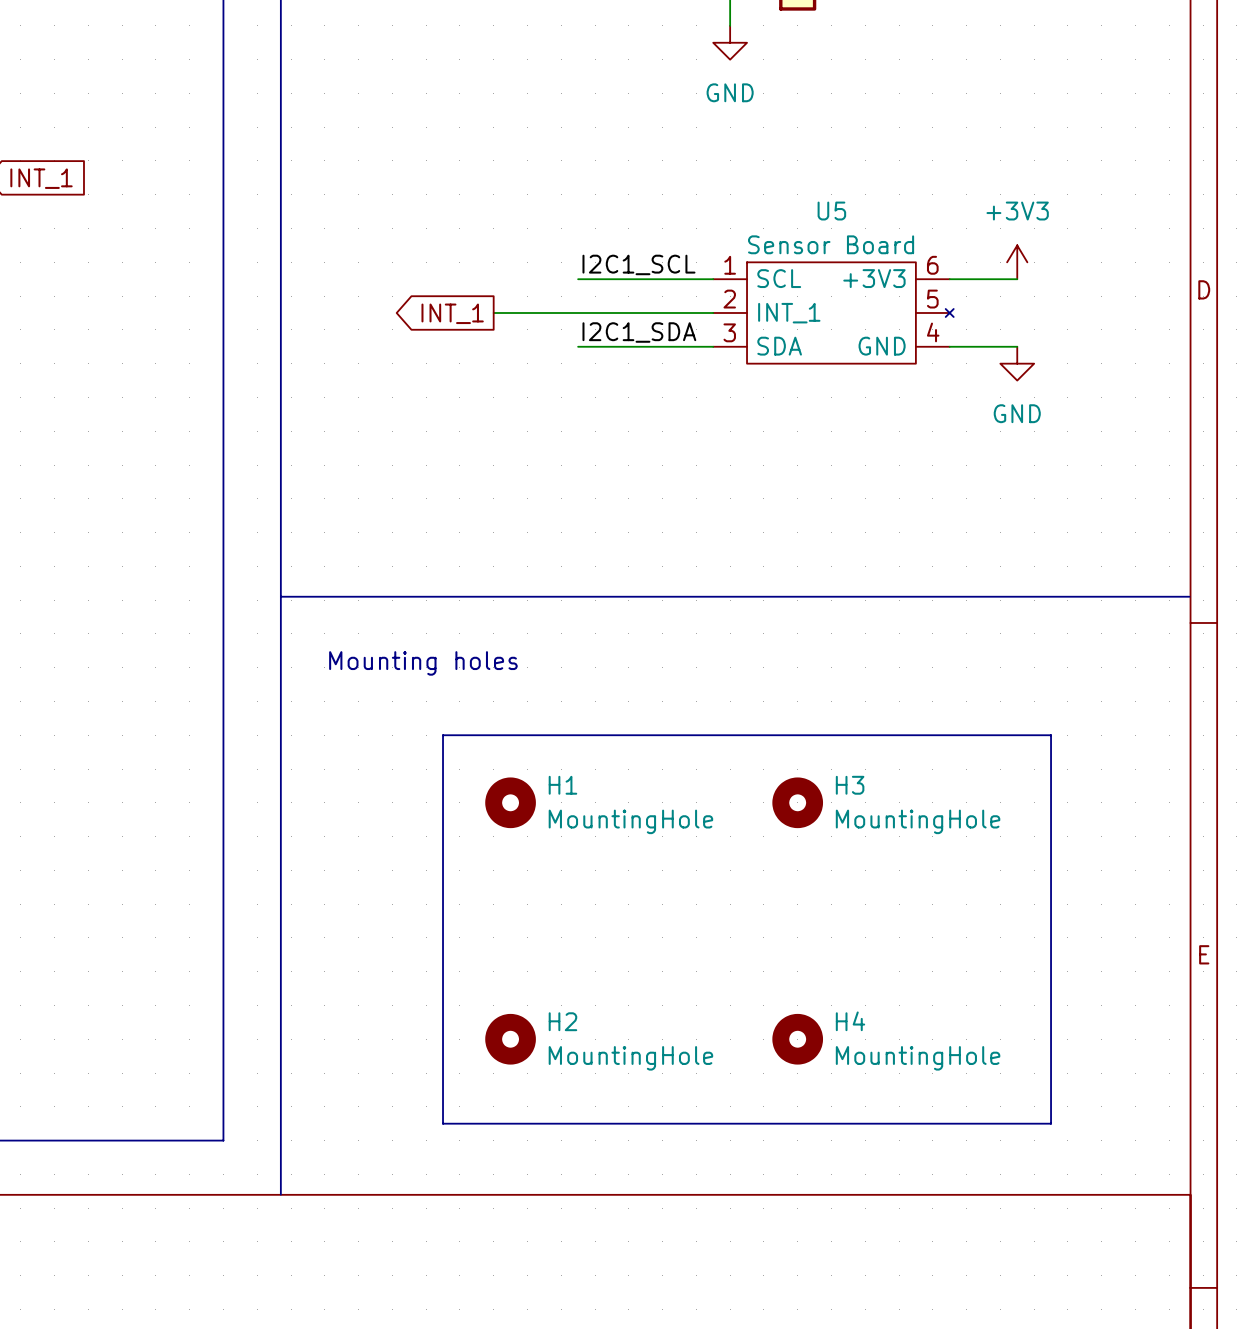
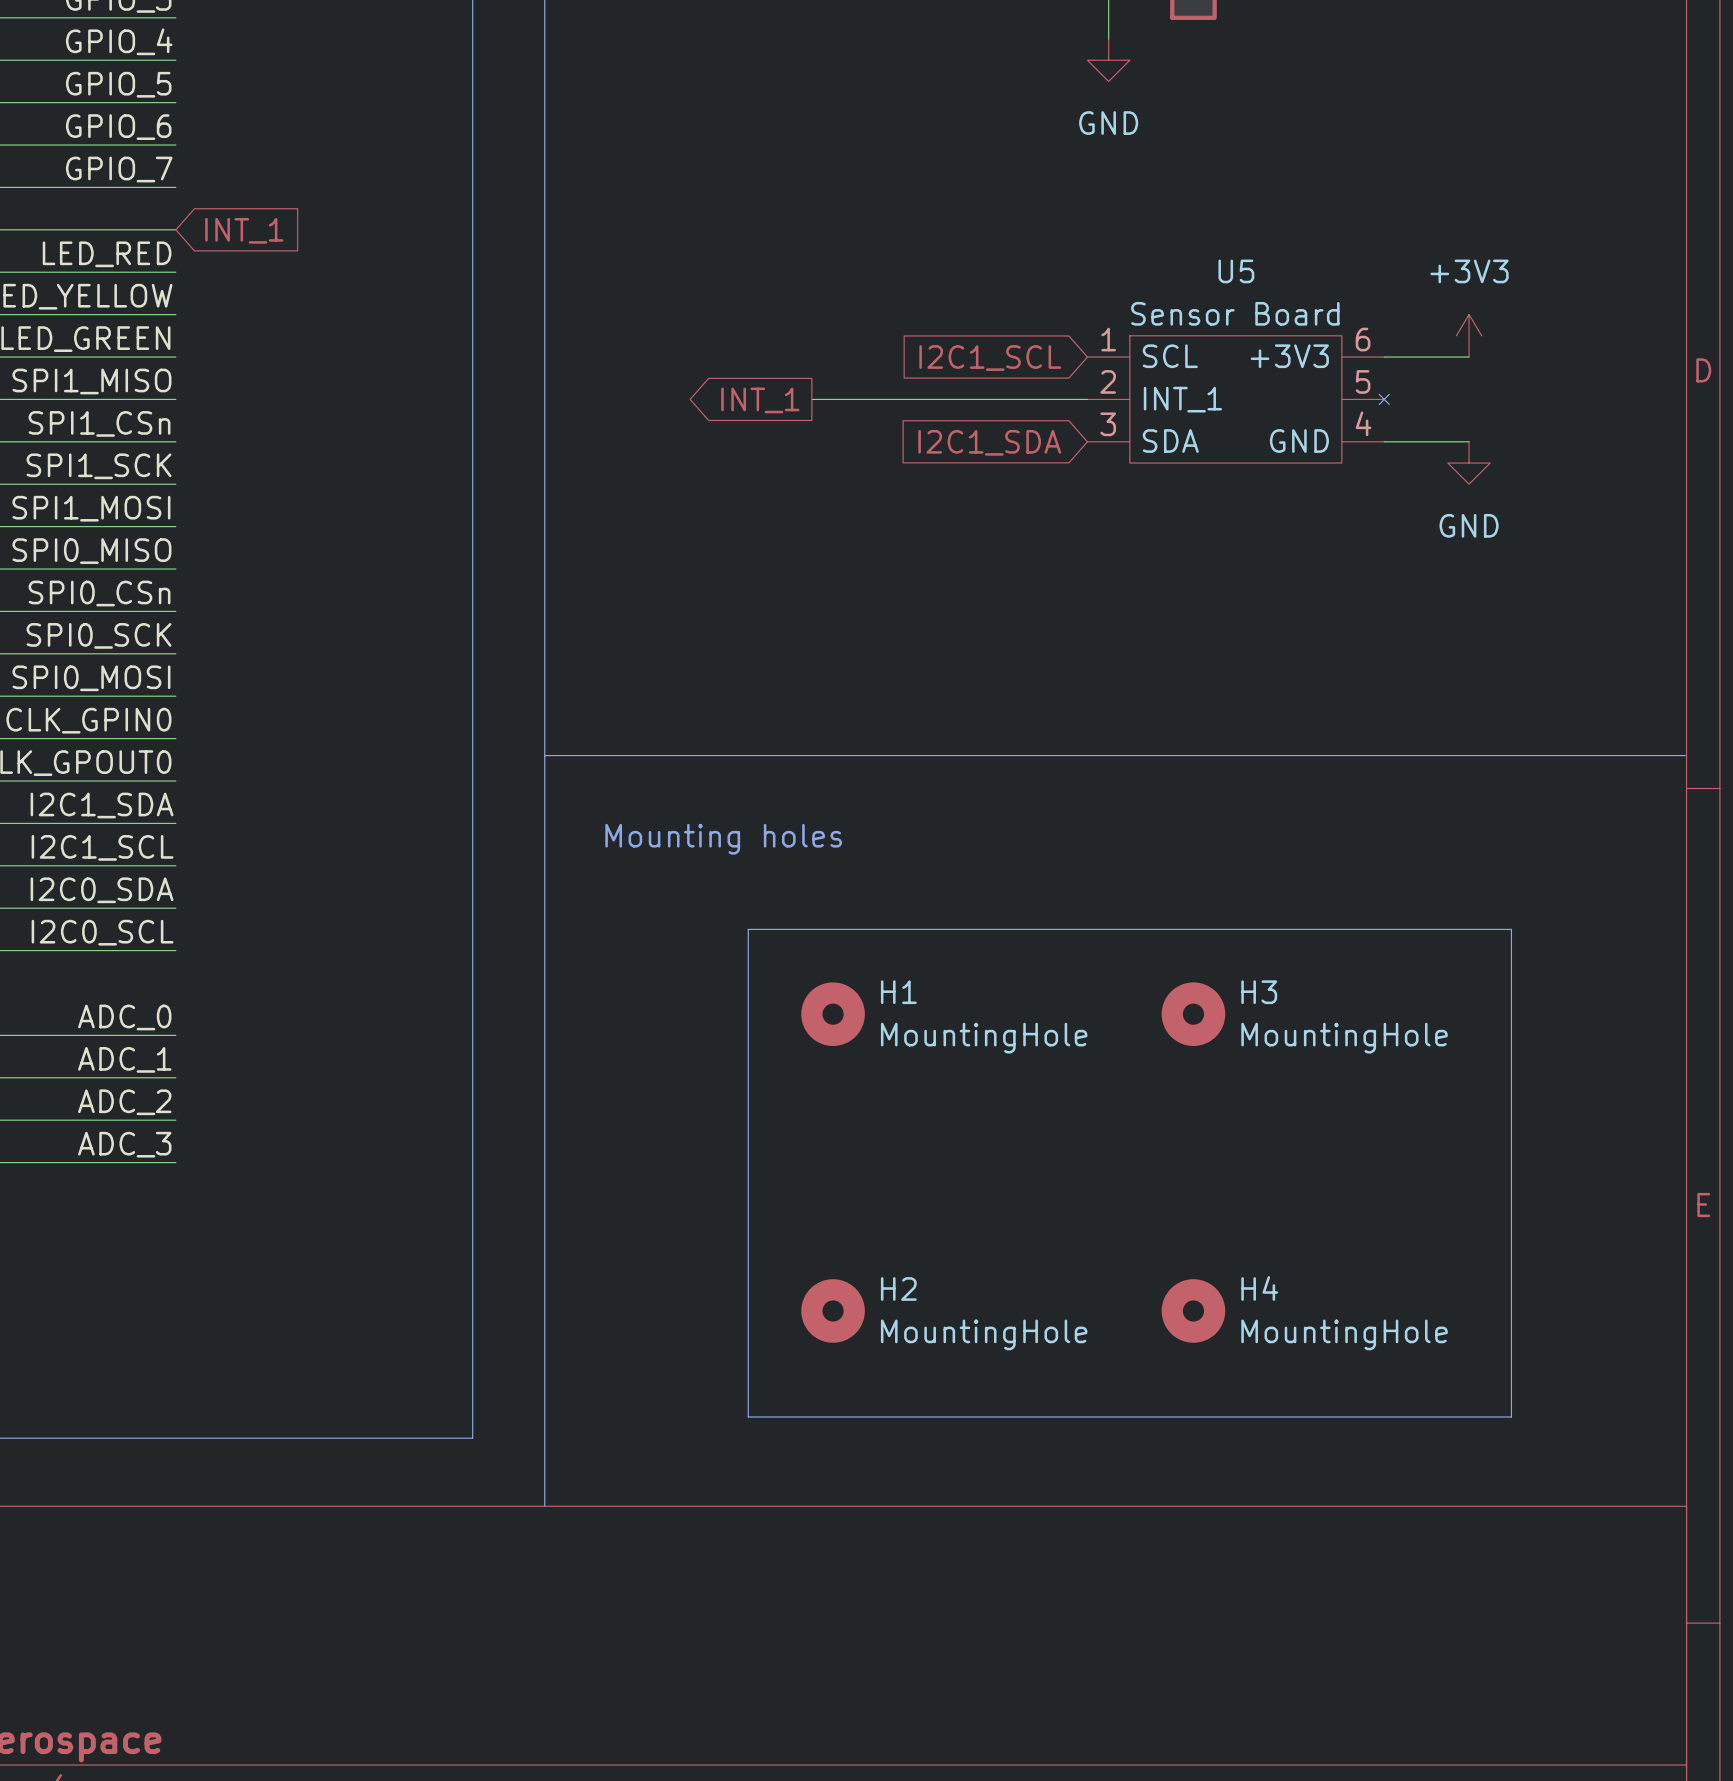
label: I2C1_SCL (638, 264) -> none
wire: (578, 279) (713, 279) -> none
global label: none -> I2C1_SCL (990, 358)
label: I2C1_SDA (639, 332) -> none
wire: (578, 346) (713, 346) -> none
global label: none -> I2C1_SDA (989, 442)

